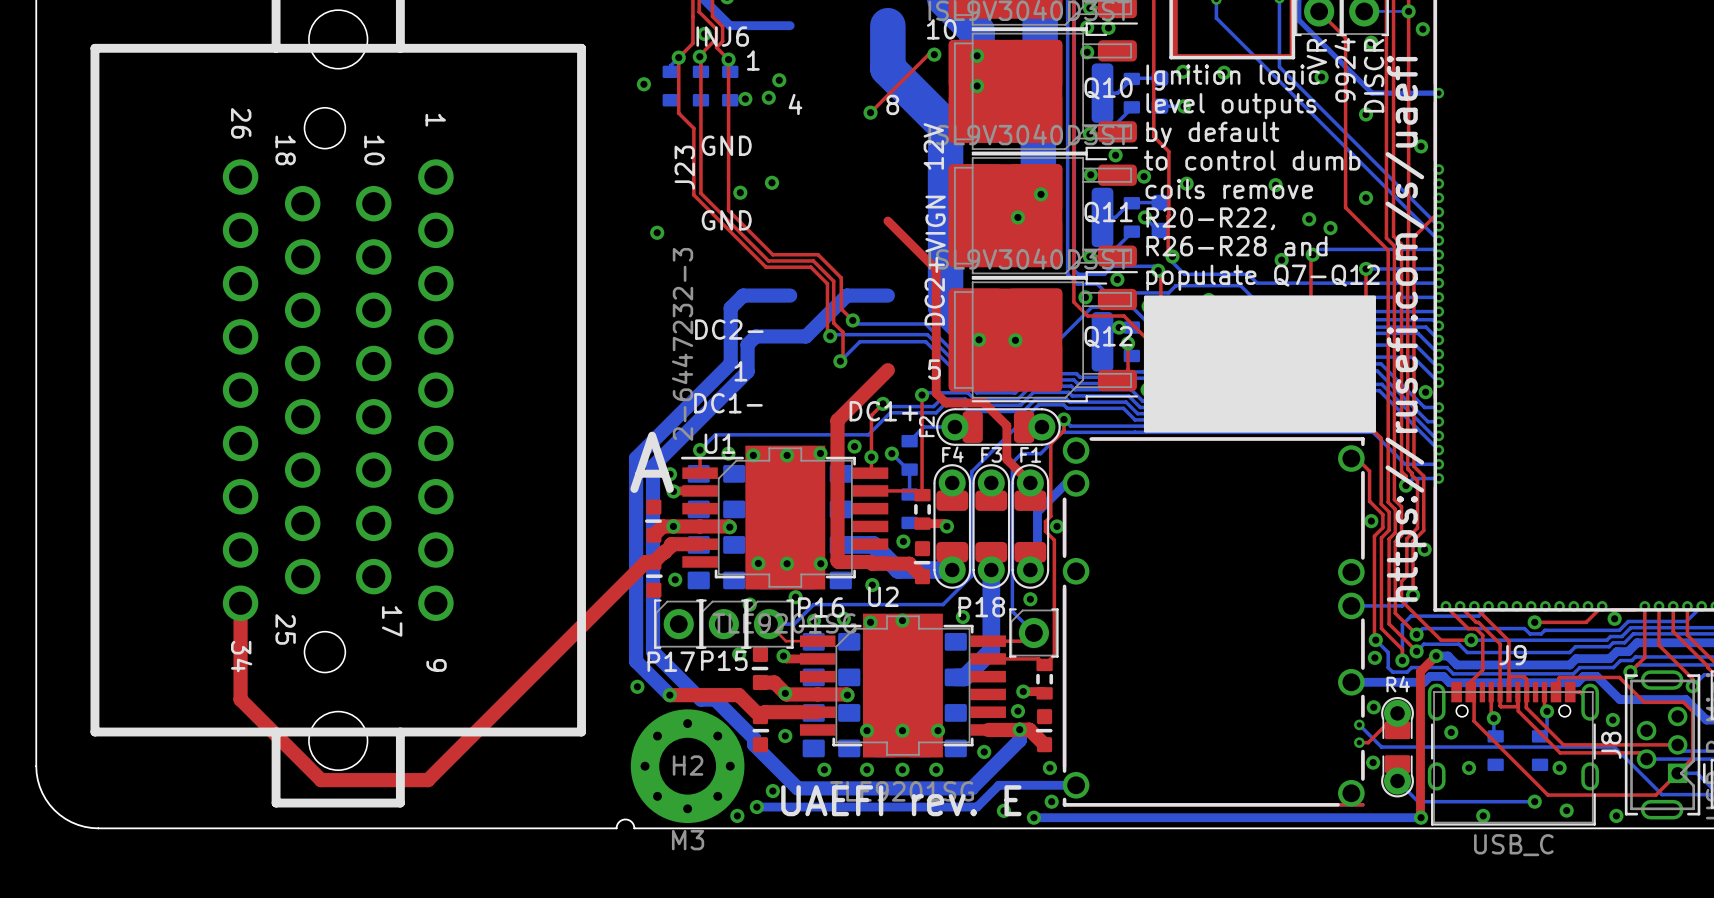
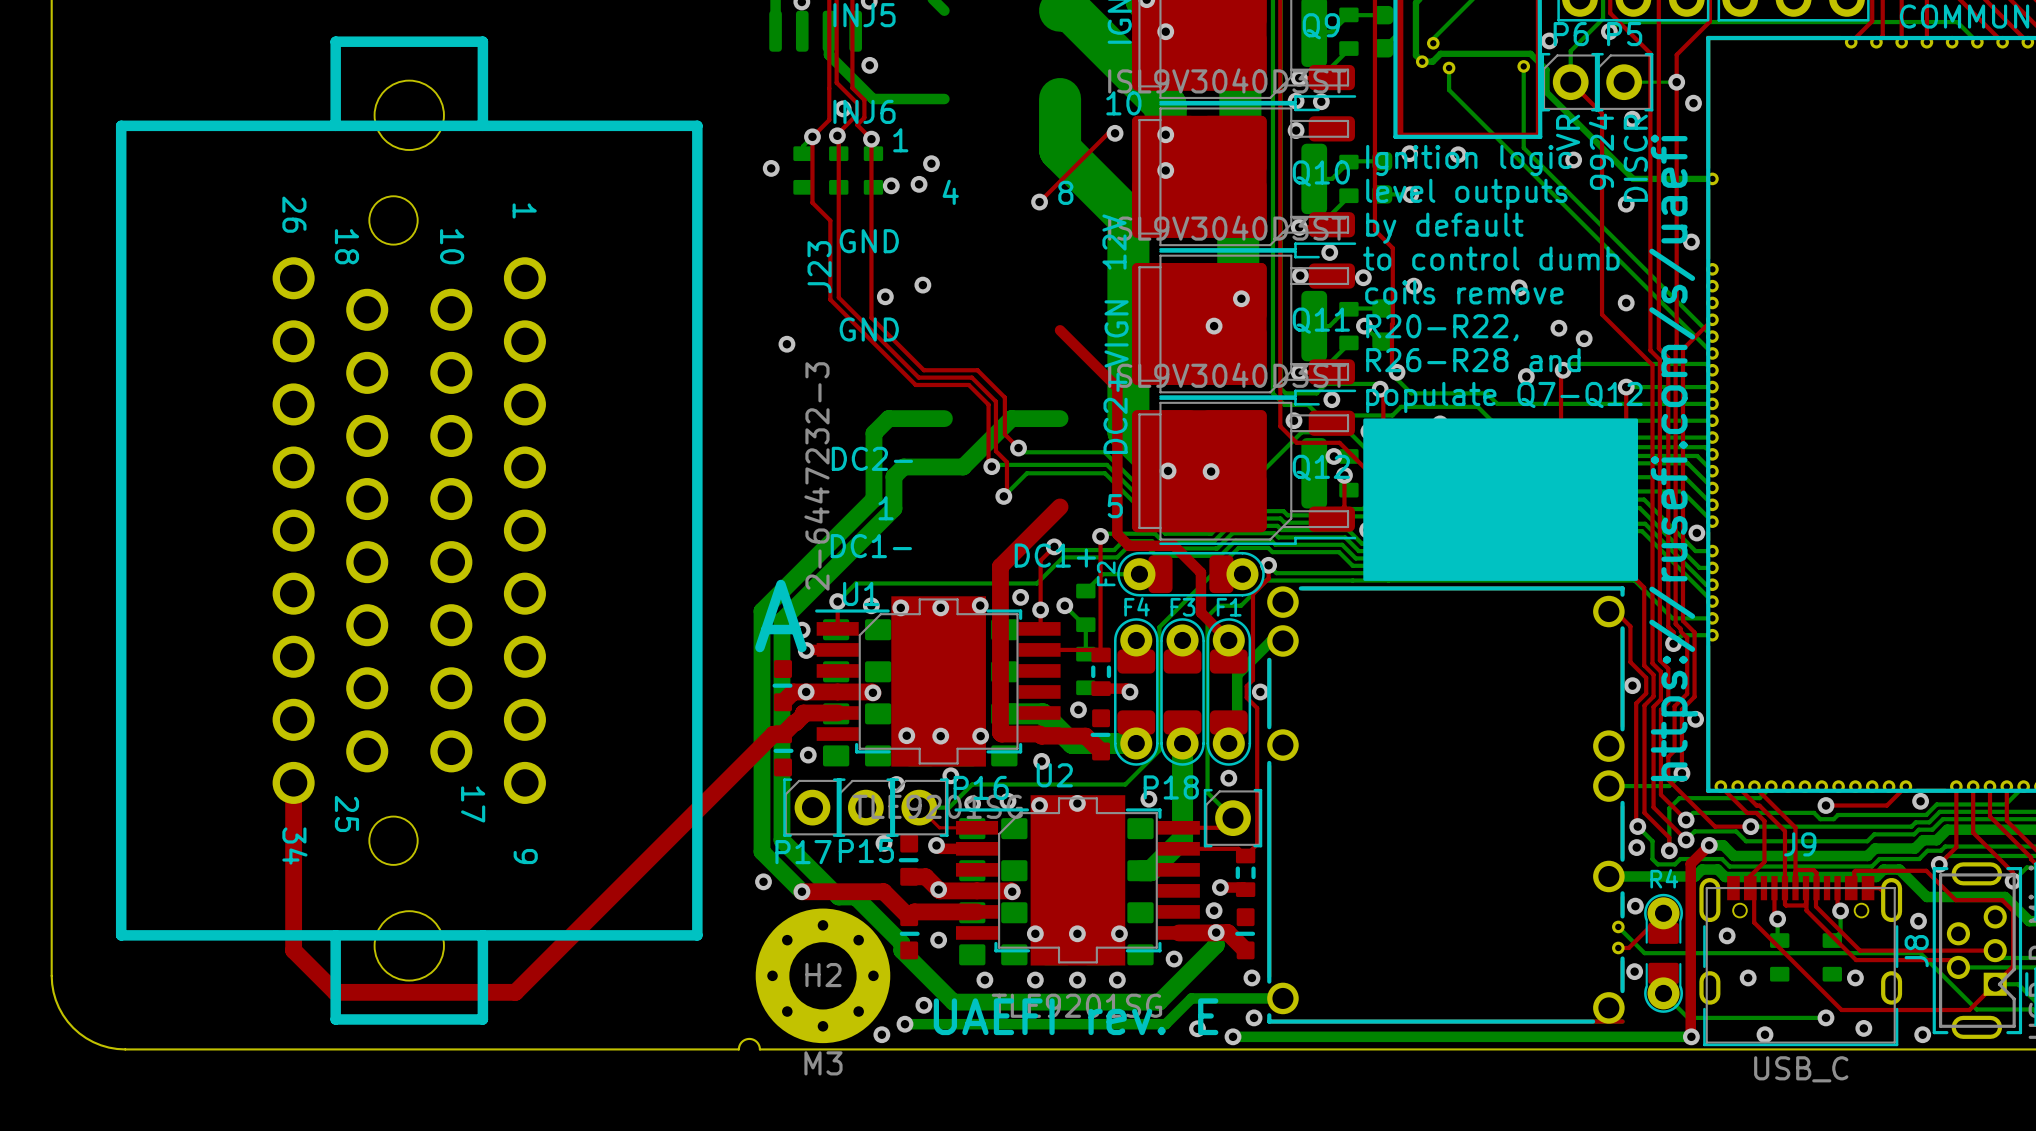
top track: (240, 699) (321, 780) -> (293, 896) (293, 950) (335, 992) (389, 992)

